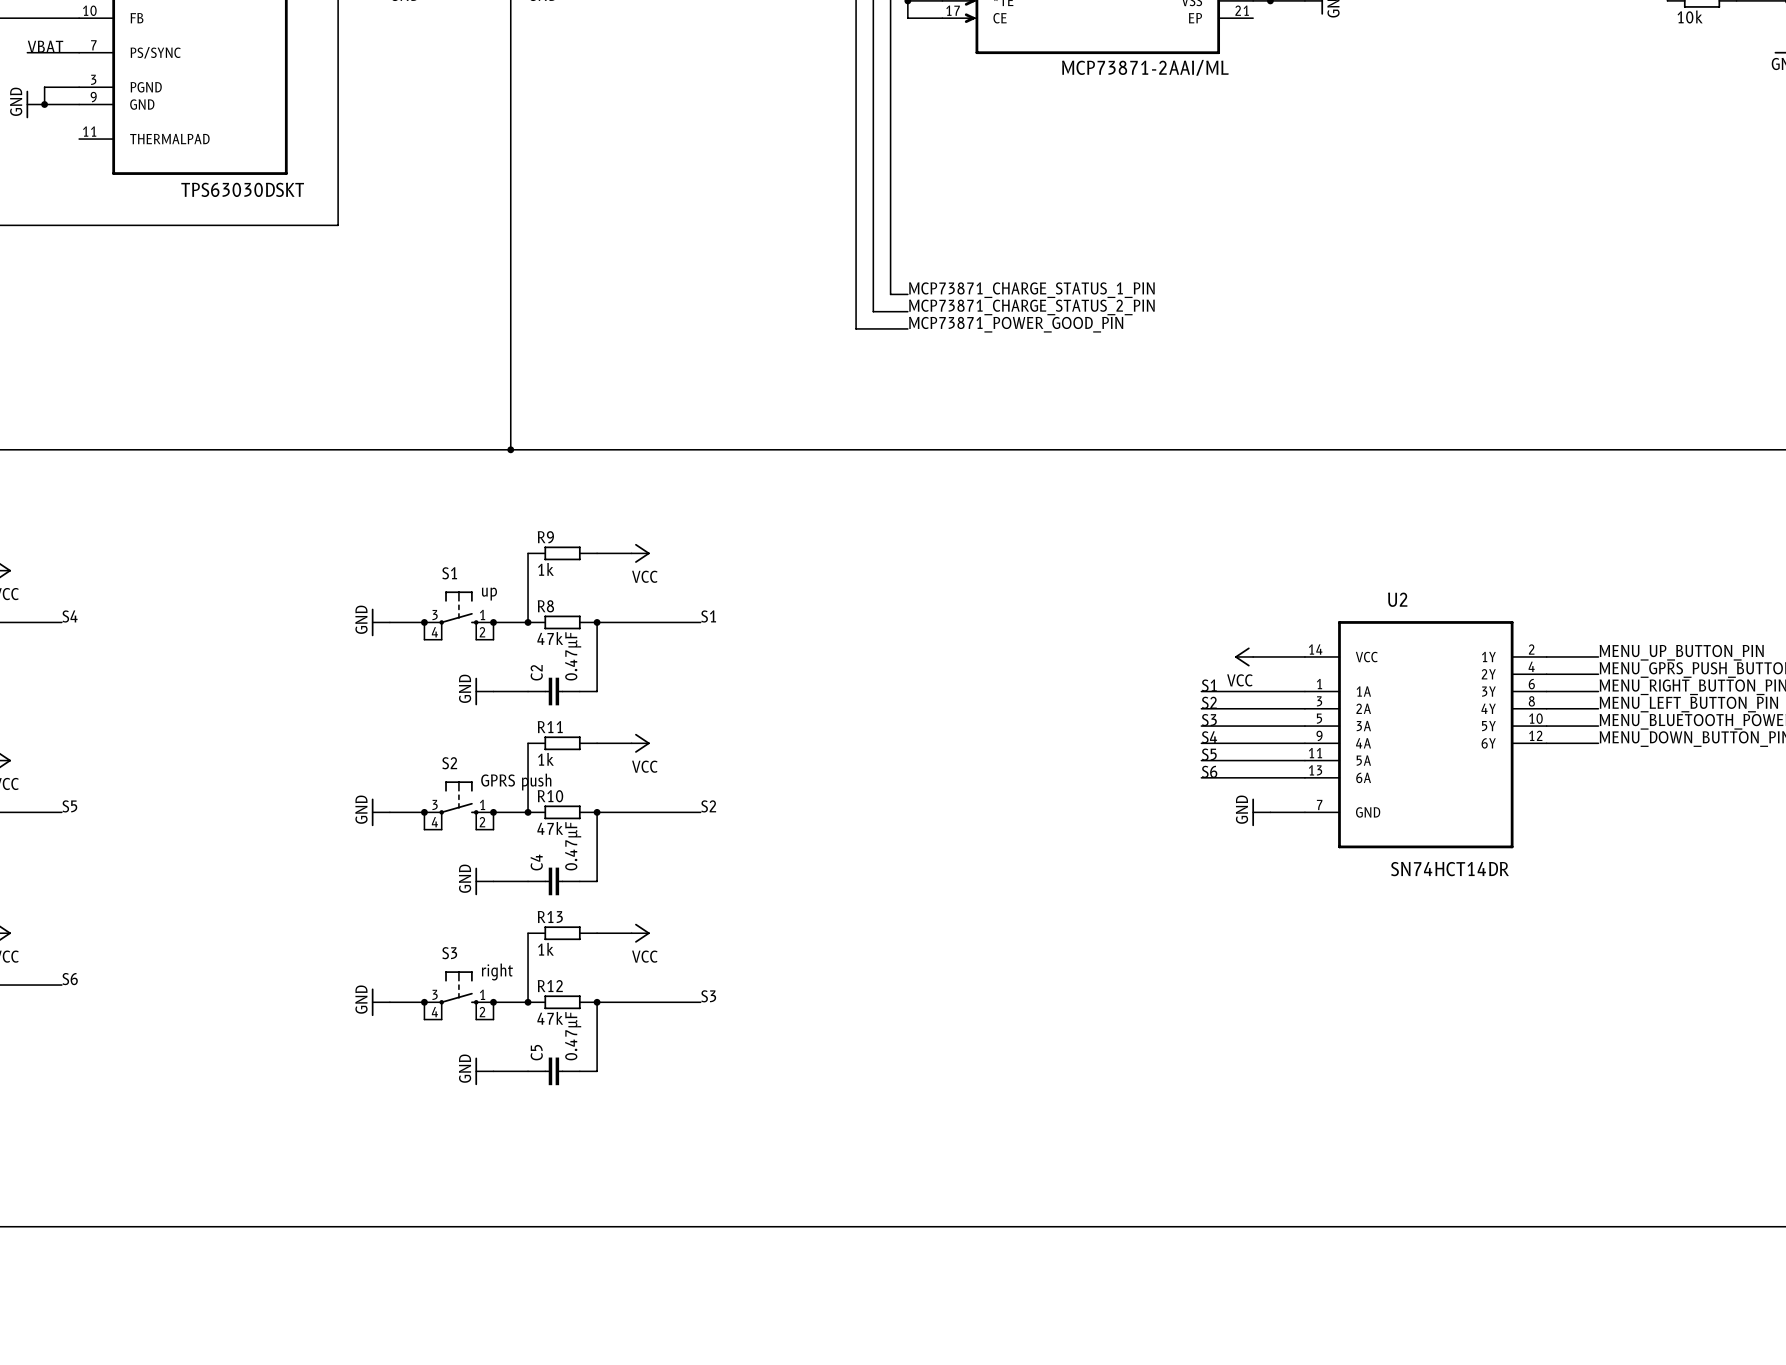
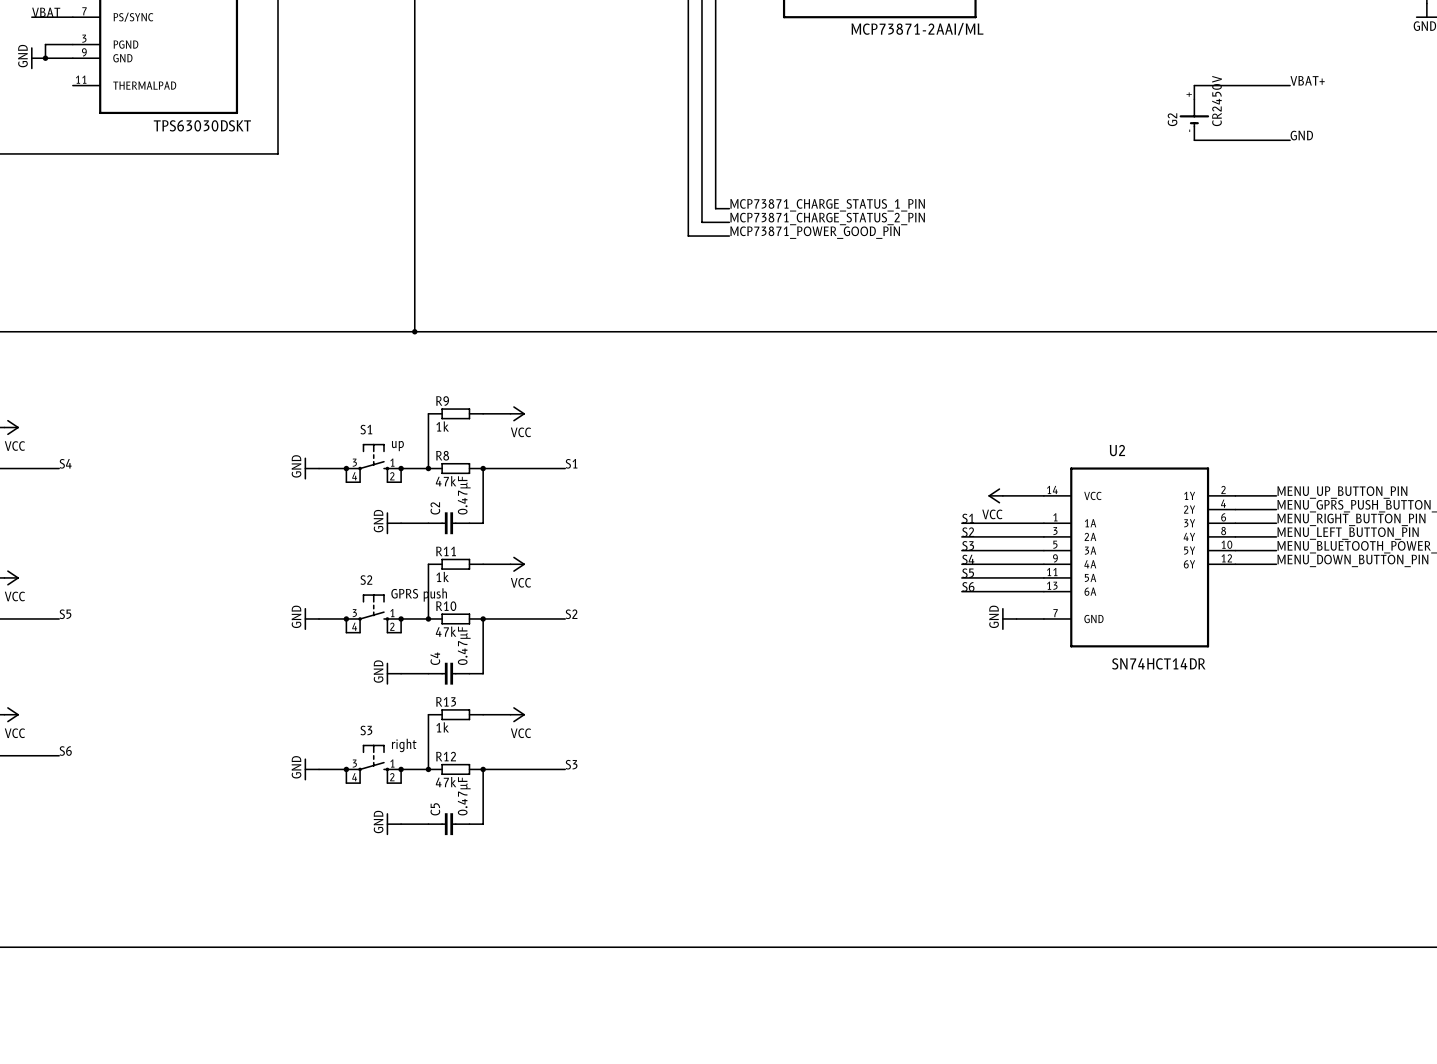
label: none -> VBAT+ (1307, 80)
wire: none -> (1194, 85) (1290, 85)
G2: none -> CR2450V (1194, 112)
label: none -> GND (1301, 135)
wire: none -> (1194, 140) (1290, 140)

